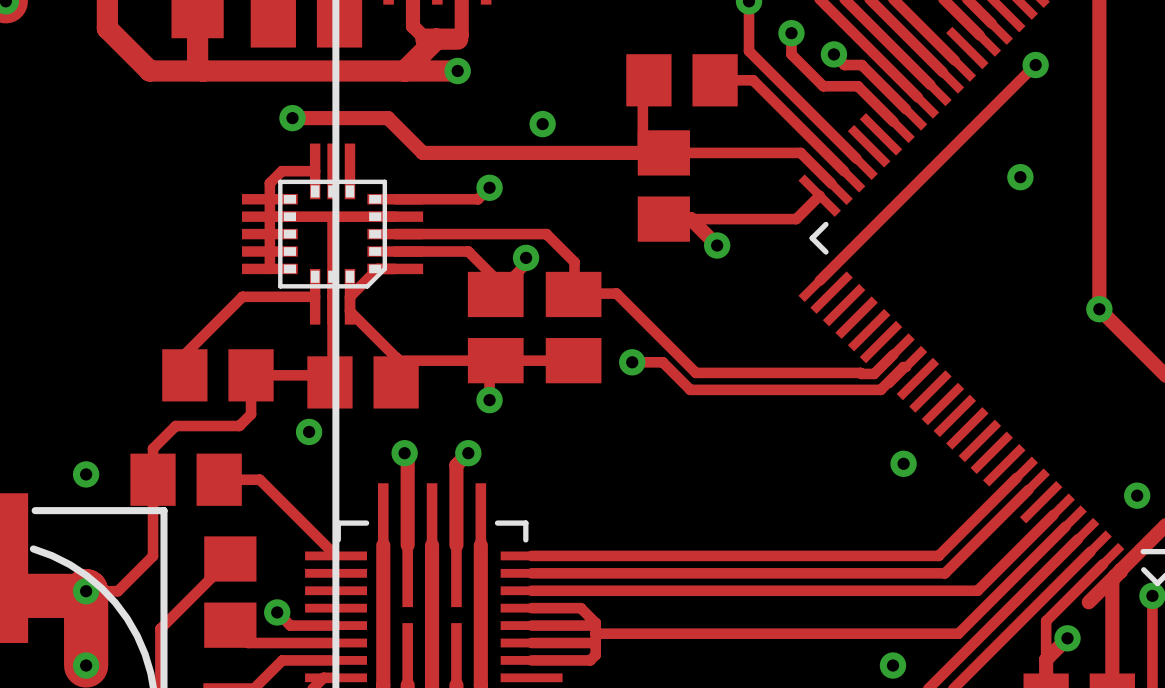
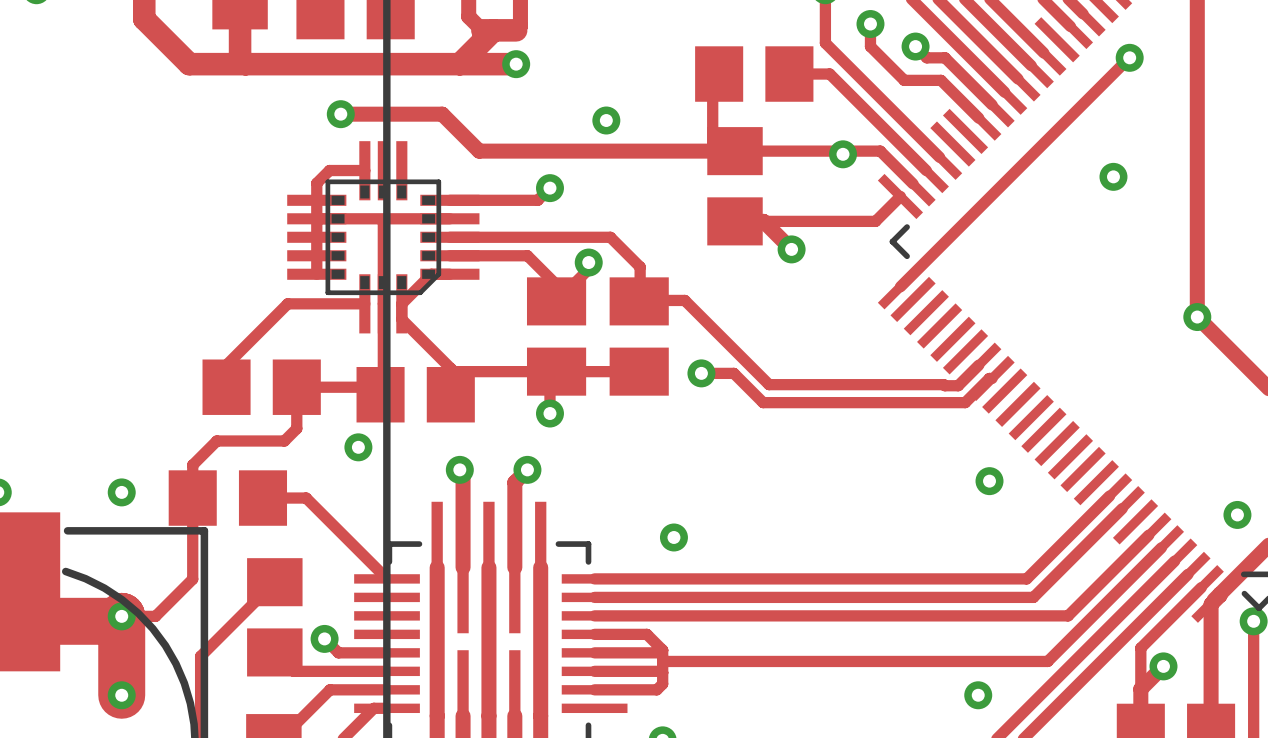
via: none -> (843, 154)
via: none -> (673, 537)
track: (1114, 576) (1088, 602) -> none

